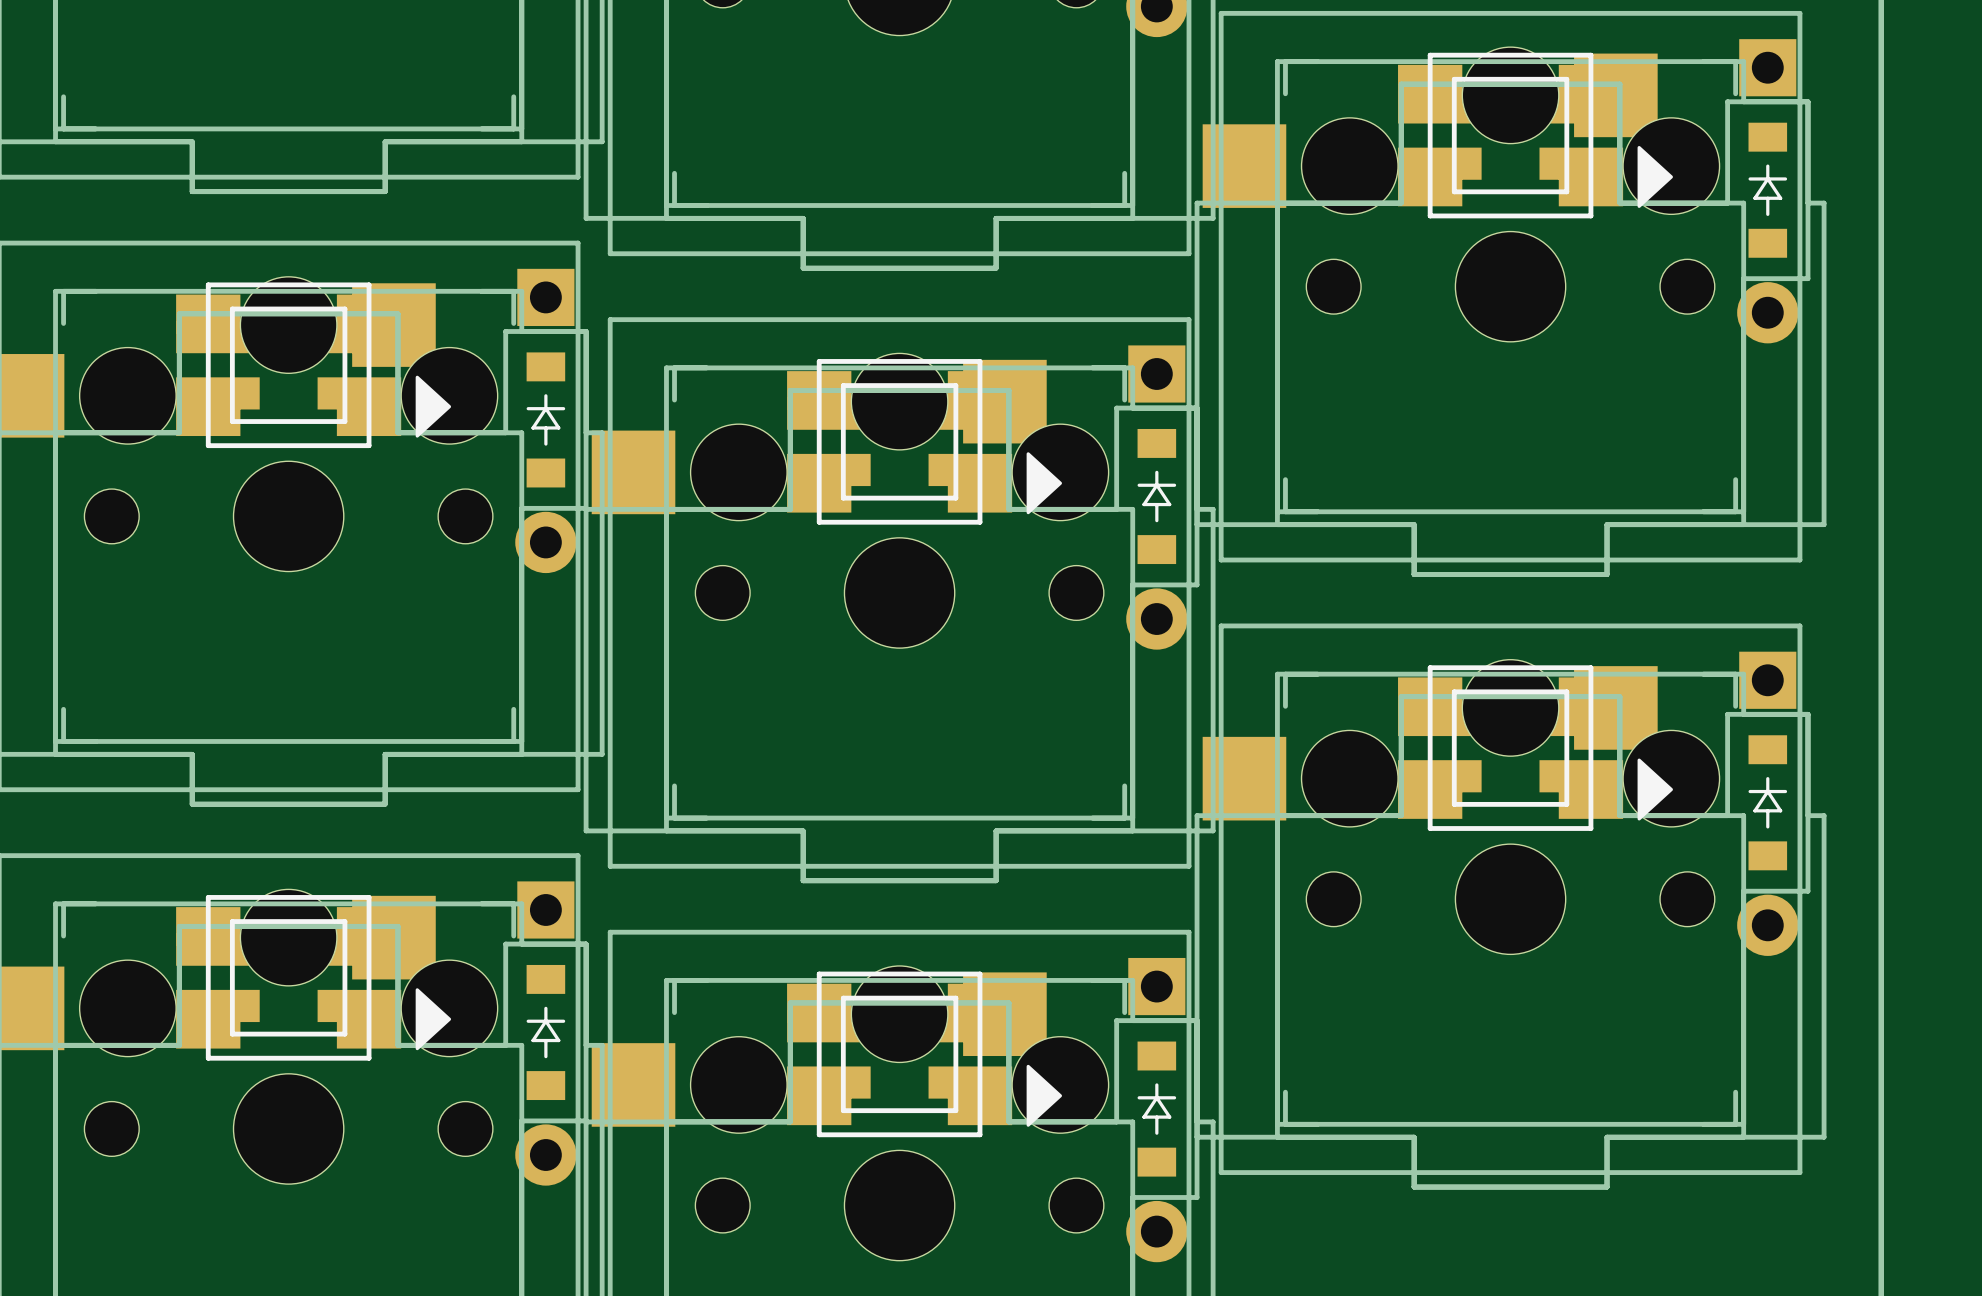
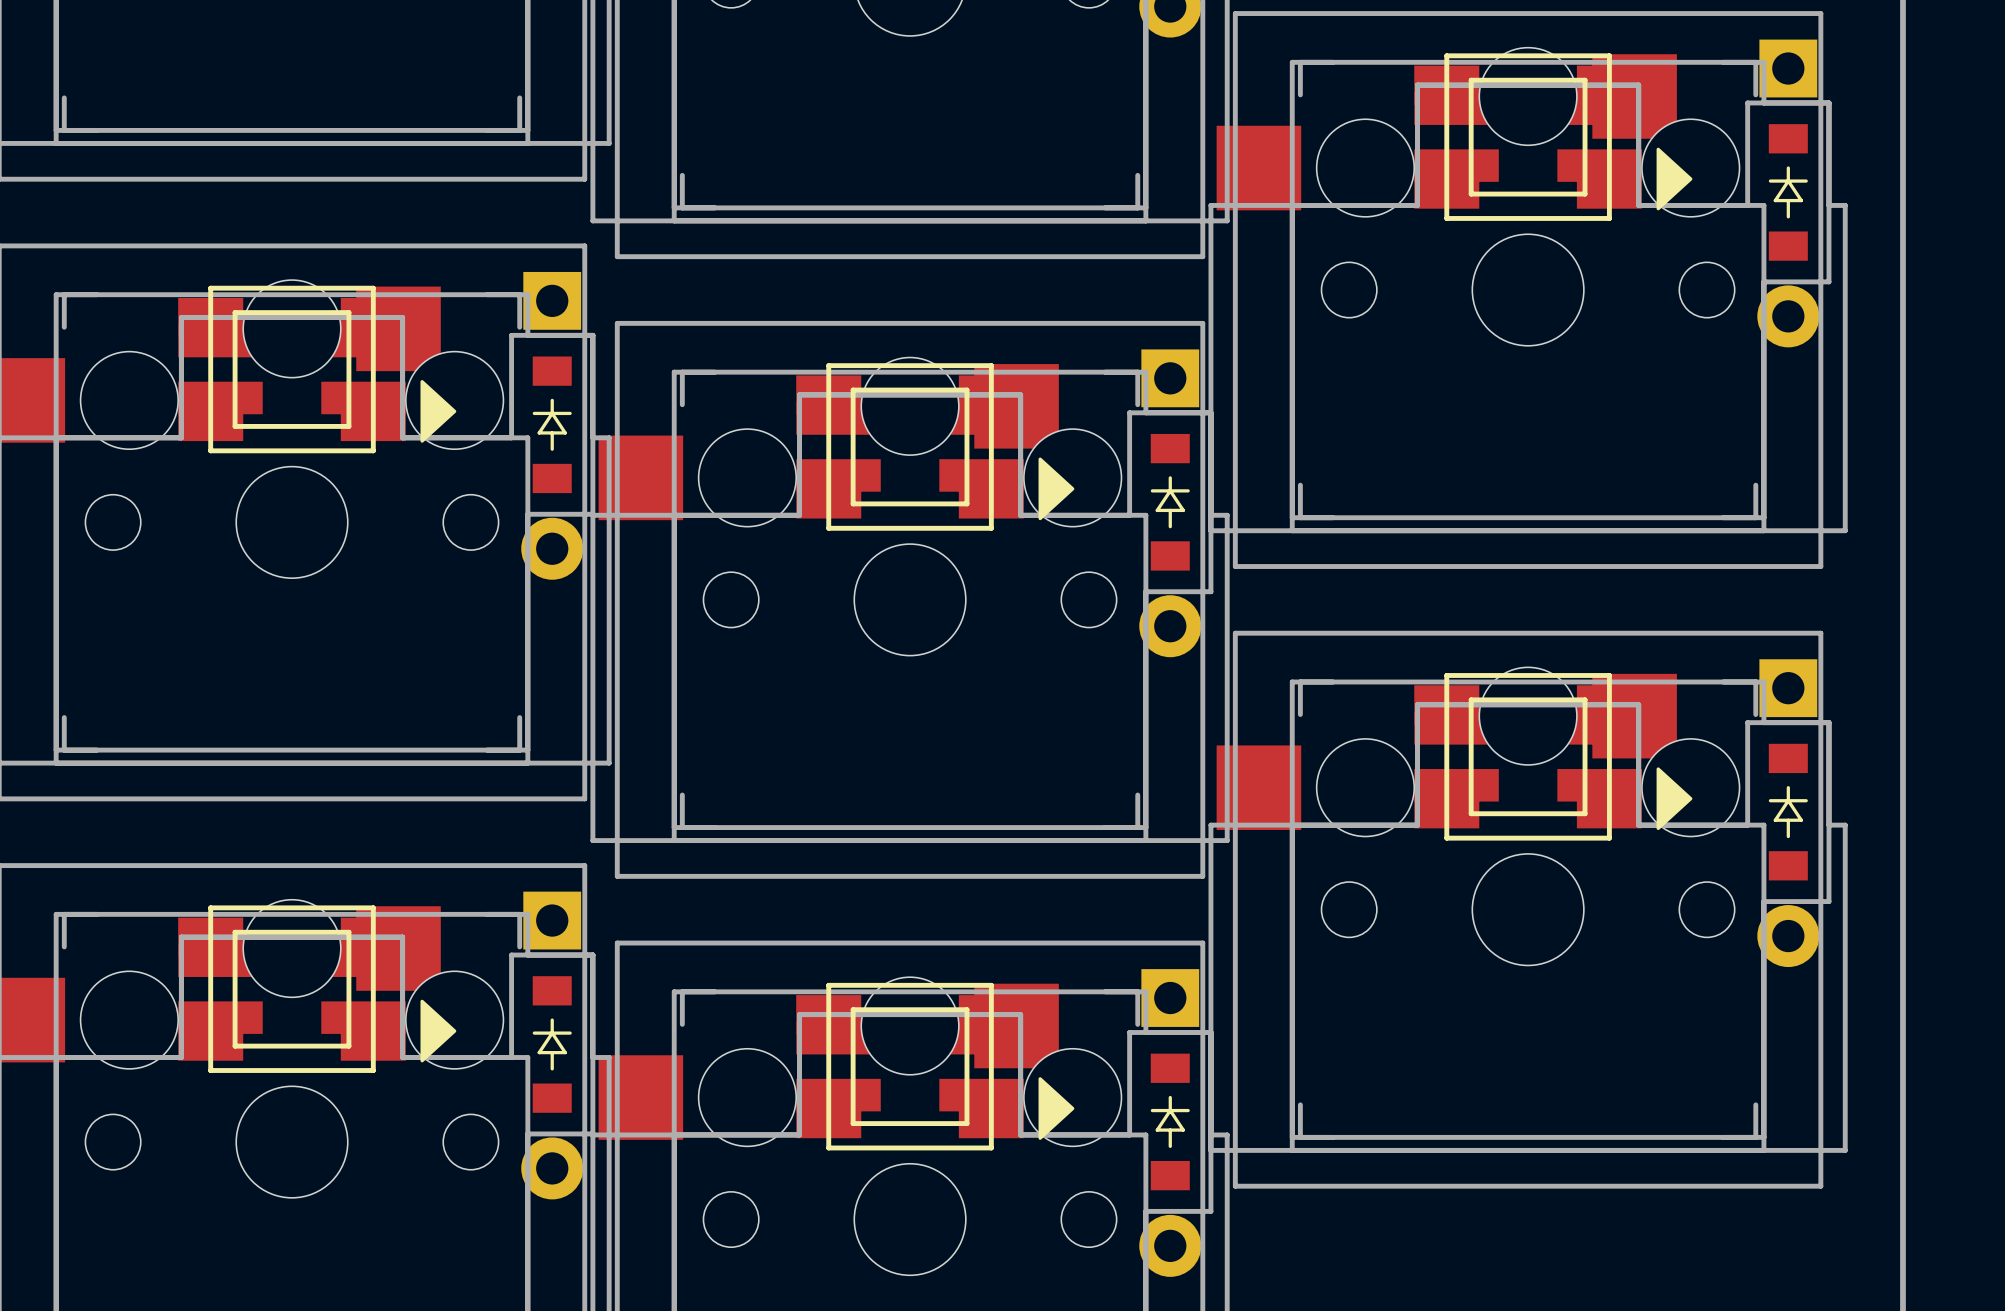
line: (192, 141) (192, 191) (385, 191) (385, 141) -> (194, 143) (389, 143)
line: (803, 218) (803, 268) (996, 268) (996, 218) -> (812, 220) (1007, 220)
line: (1414, 524) (1414, 574) (1607, 574) (1607, 524) -> (1430, 530) (1625, 530)
line: (192, 754) (192, 804) (385, 804) (385, 754) -> (194, 763) (389, 763)
line: (803, 830) (803, 880) (996, 880) (996, 830) -> (812, 840) (1007, 840)
line: (1414, 1137) (1414, 1187) (1607, 1187) (1607, 1137) -> (1430, 1150) (1625, 1150)

